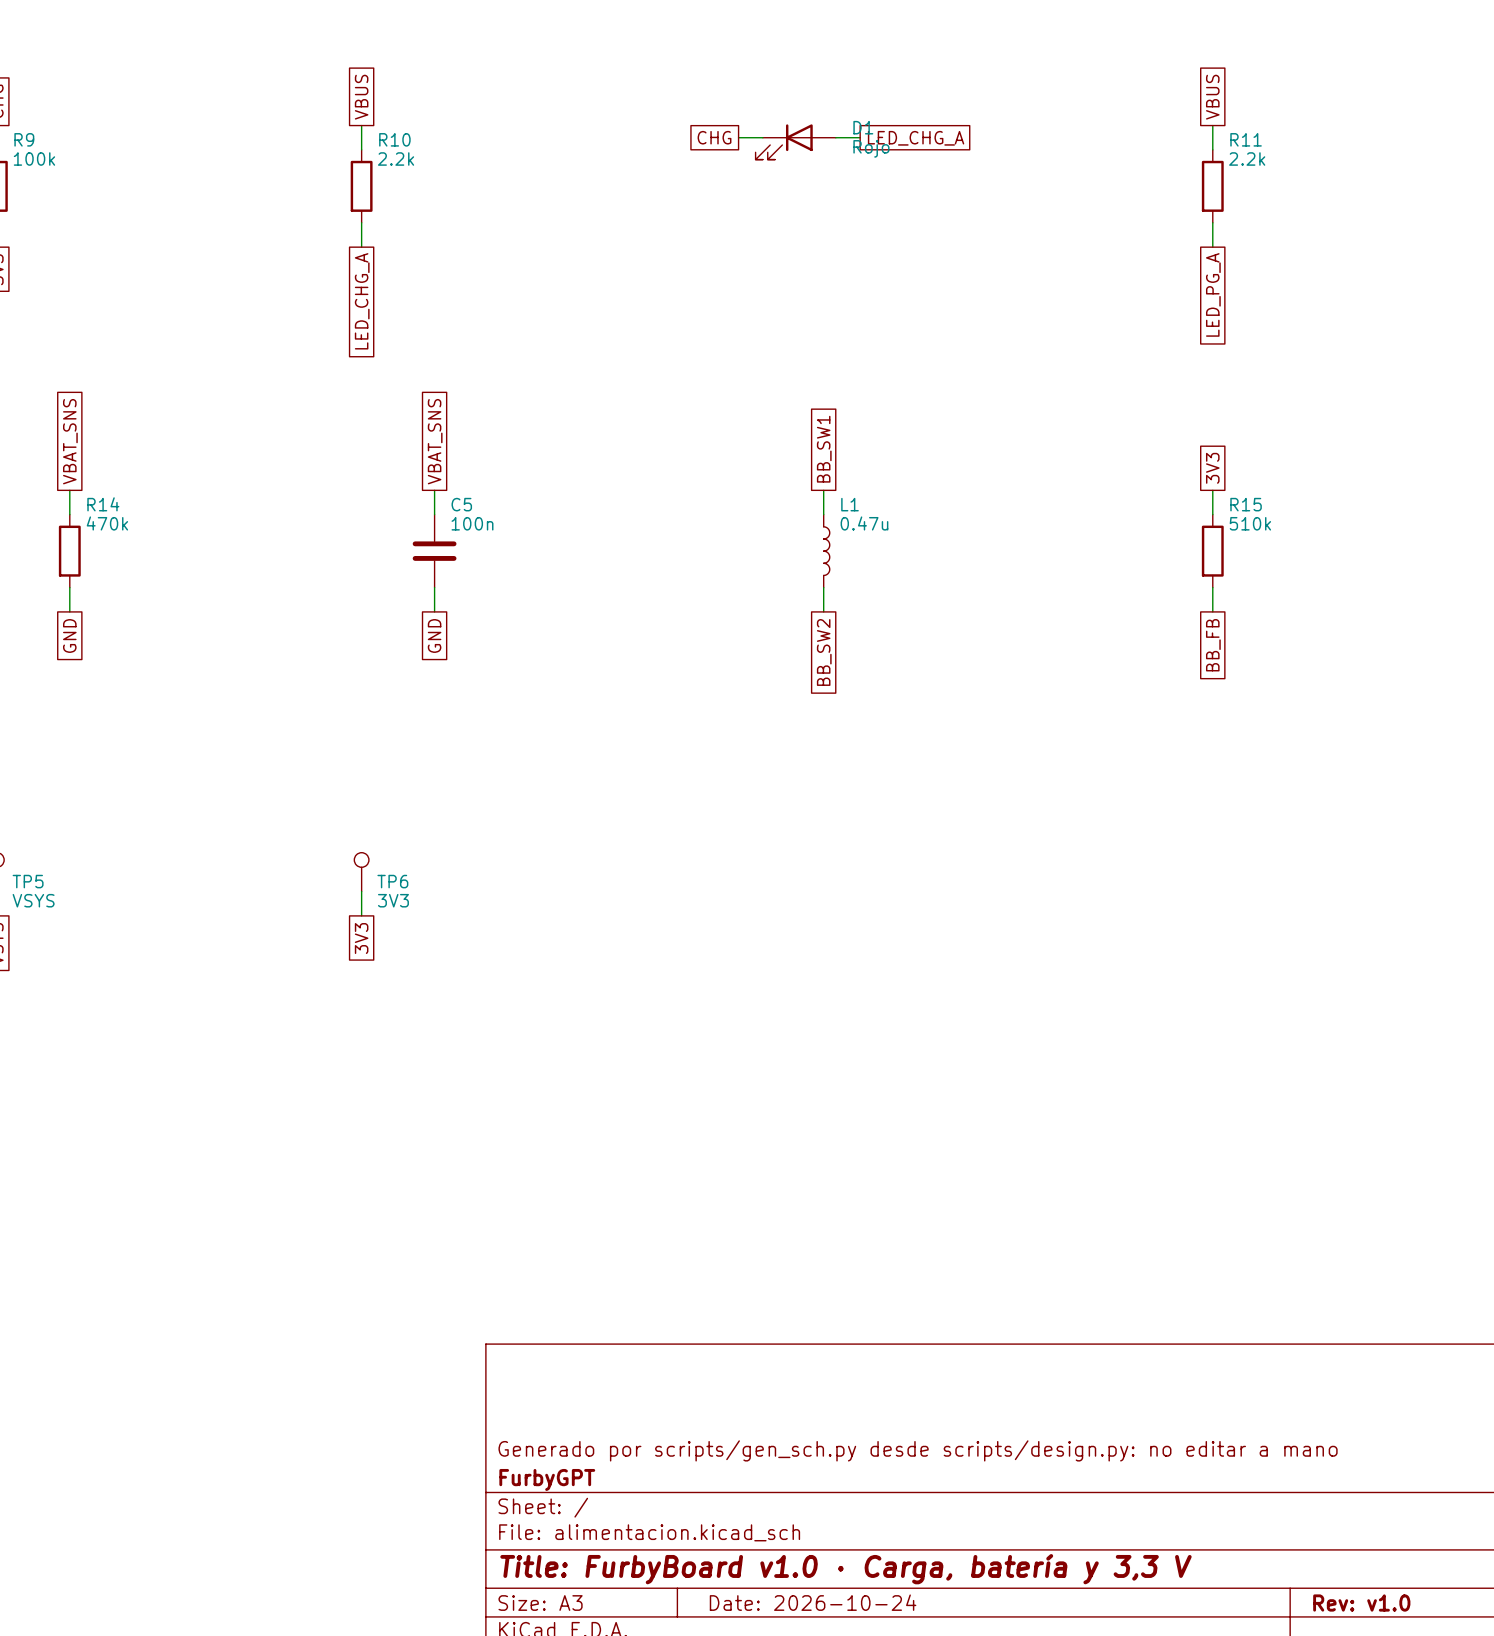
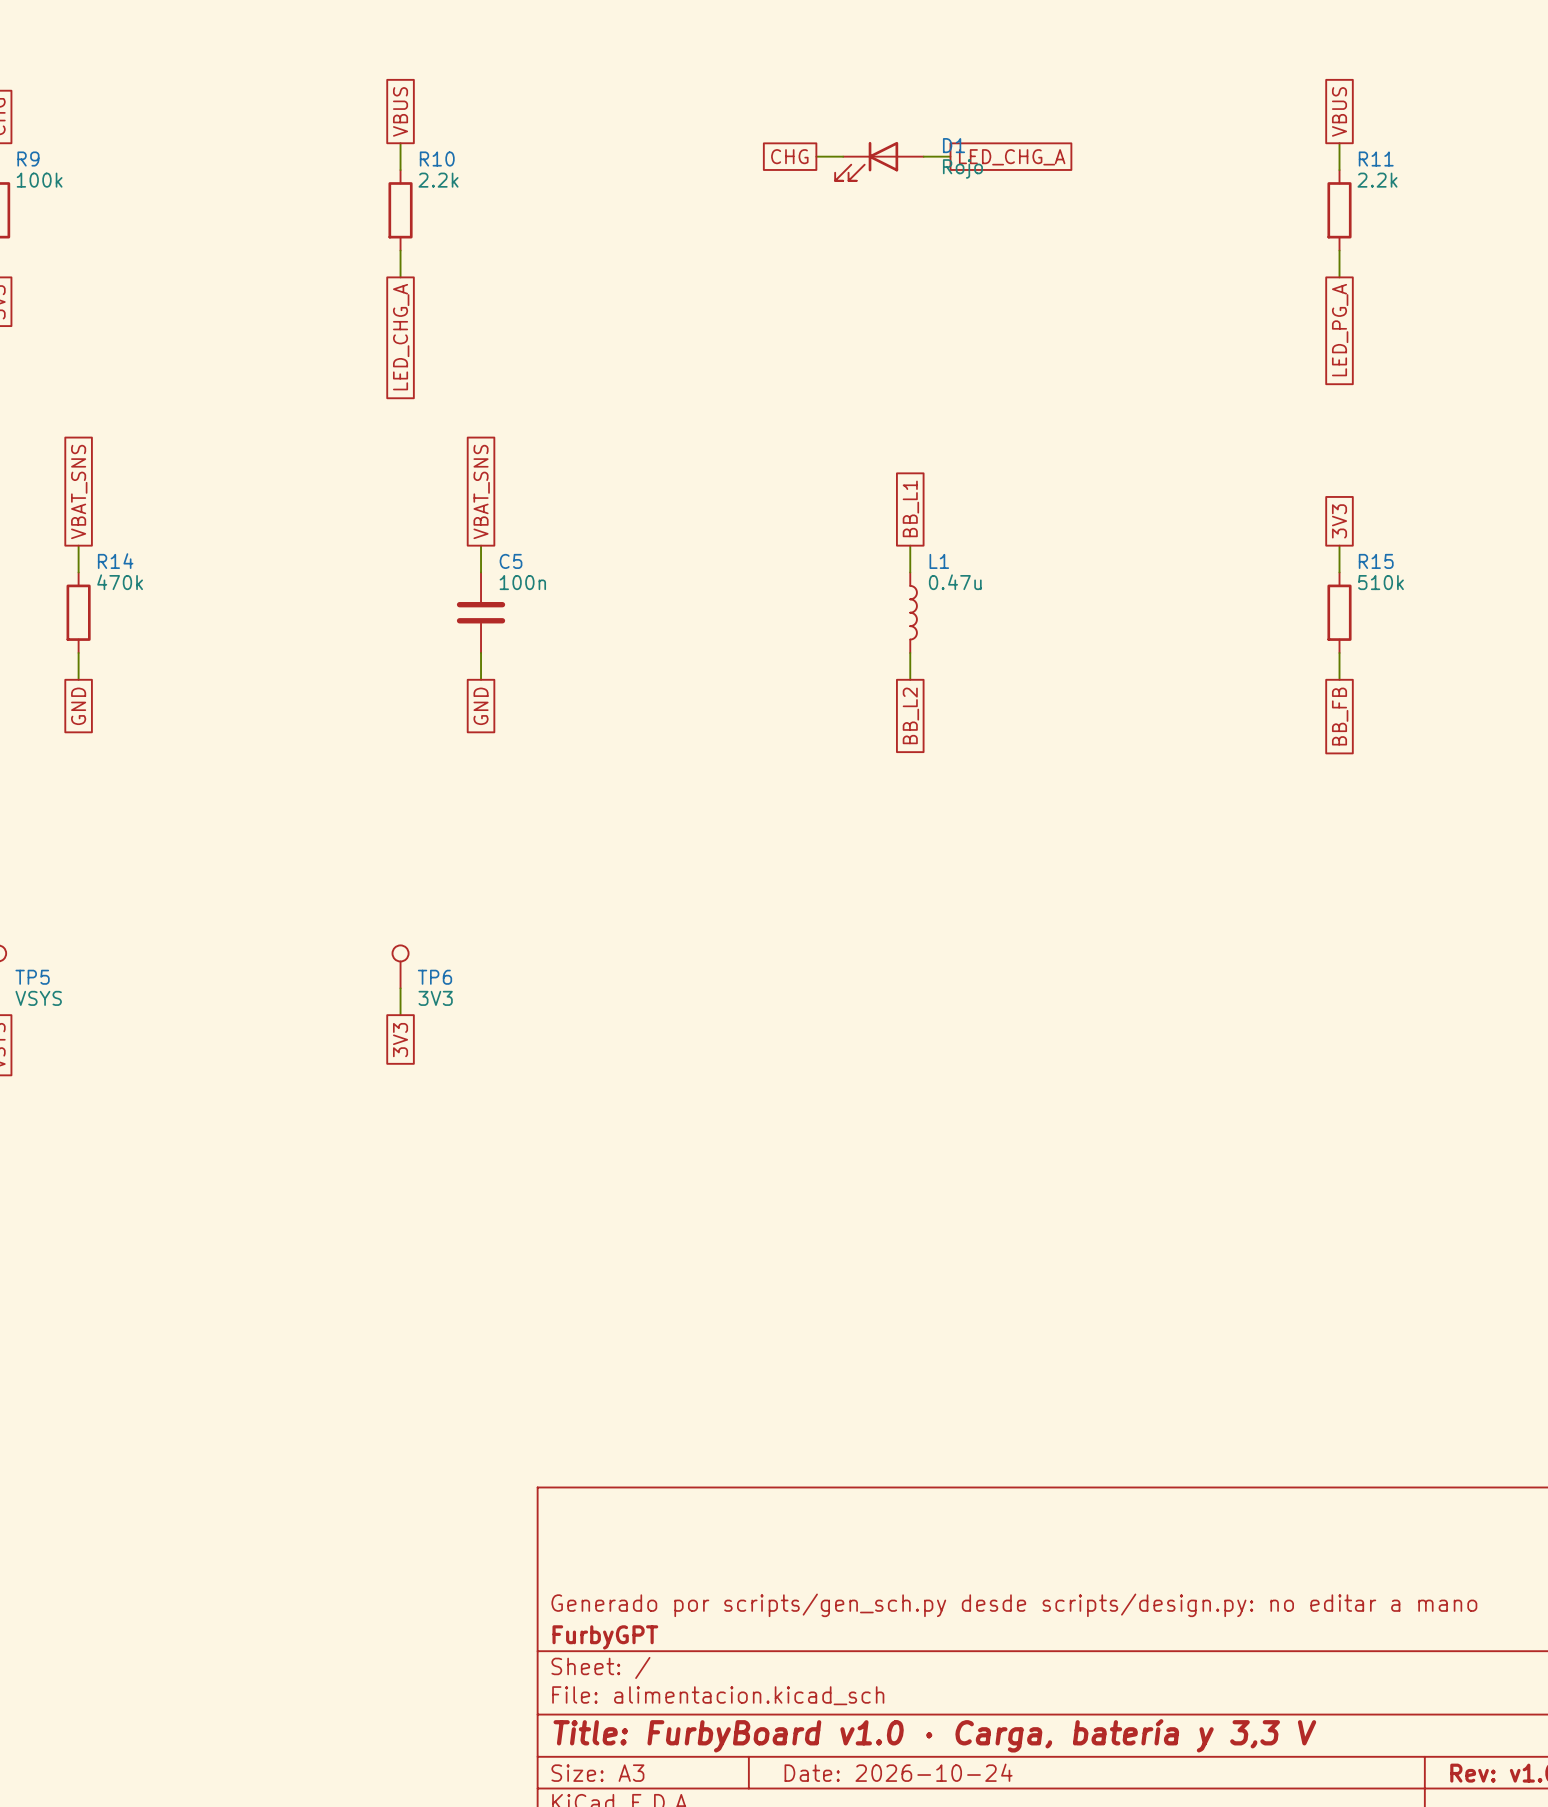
global label: BB_SW1 (824, 449) -> BB_L1 (910, 508)
global label: BB_SW2 (824, 652) -> BB_L2 (910, 715)

